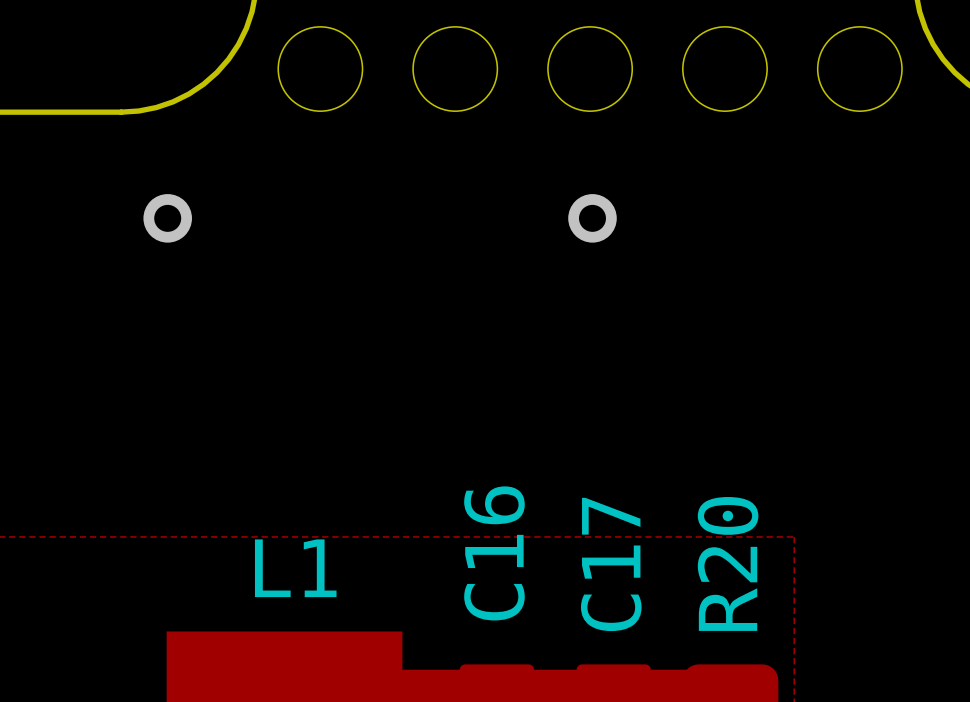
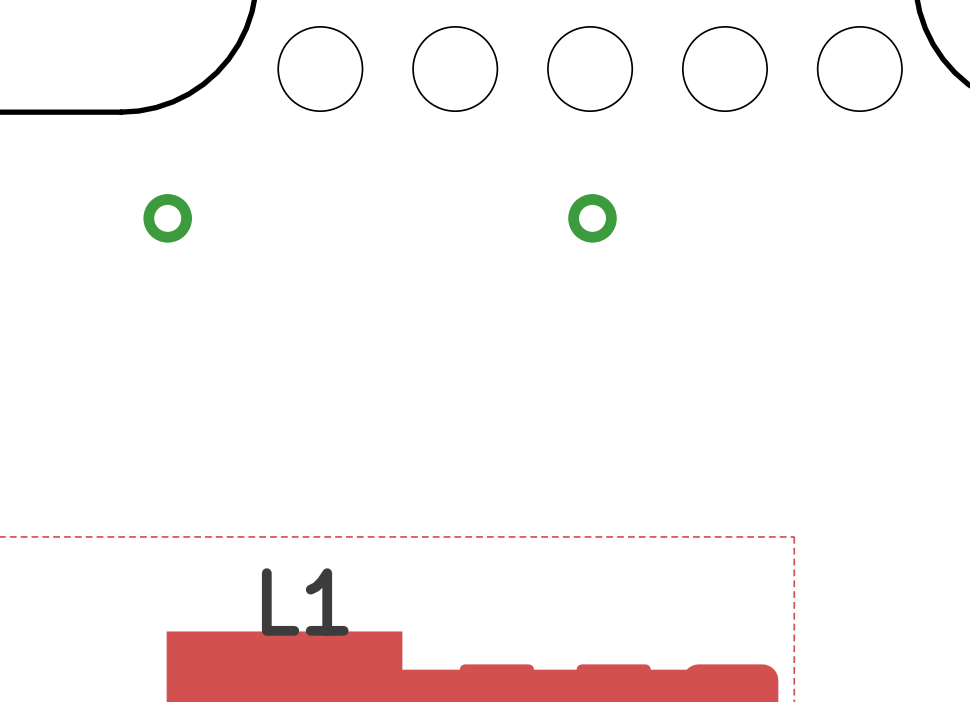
C16 name: C16 (494, 553) -> none
R20 name: R20 (728, 563) -> none
C17 name: C17 (611, 564) -> none
L1 name position: L1 (295, 568) -> L1 (305, 602)

